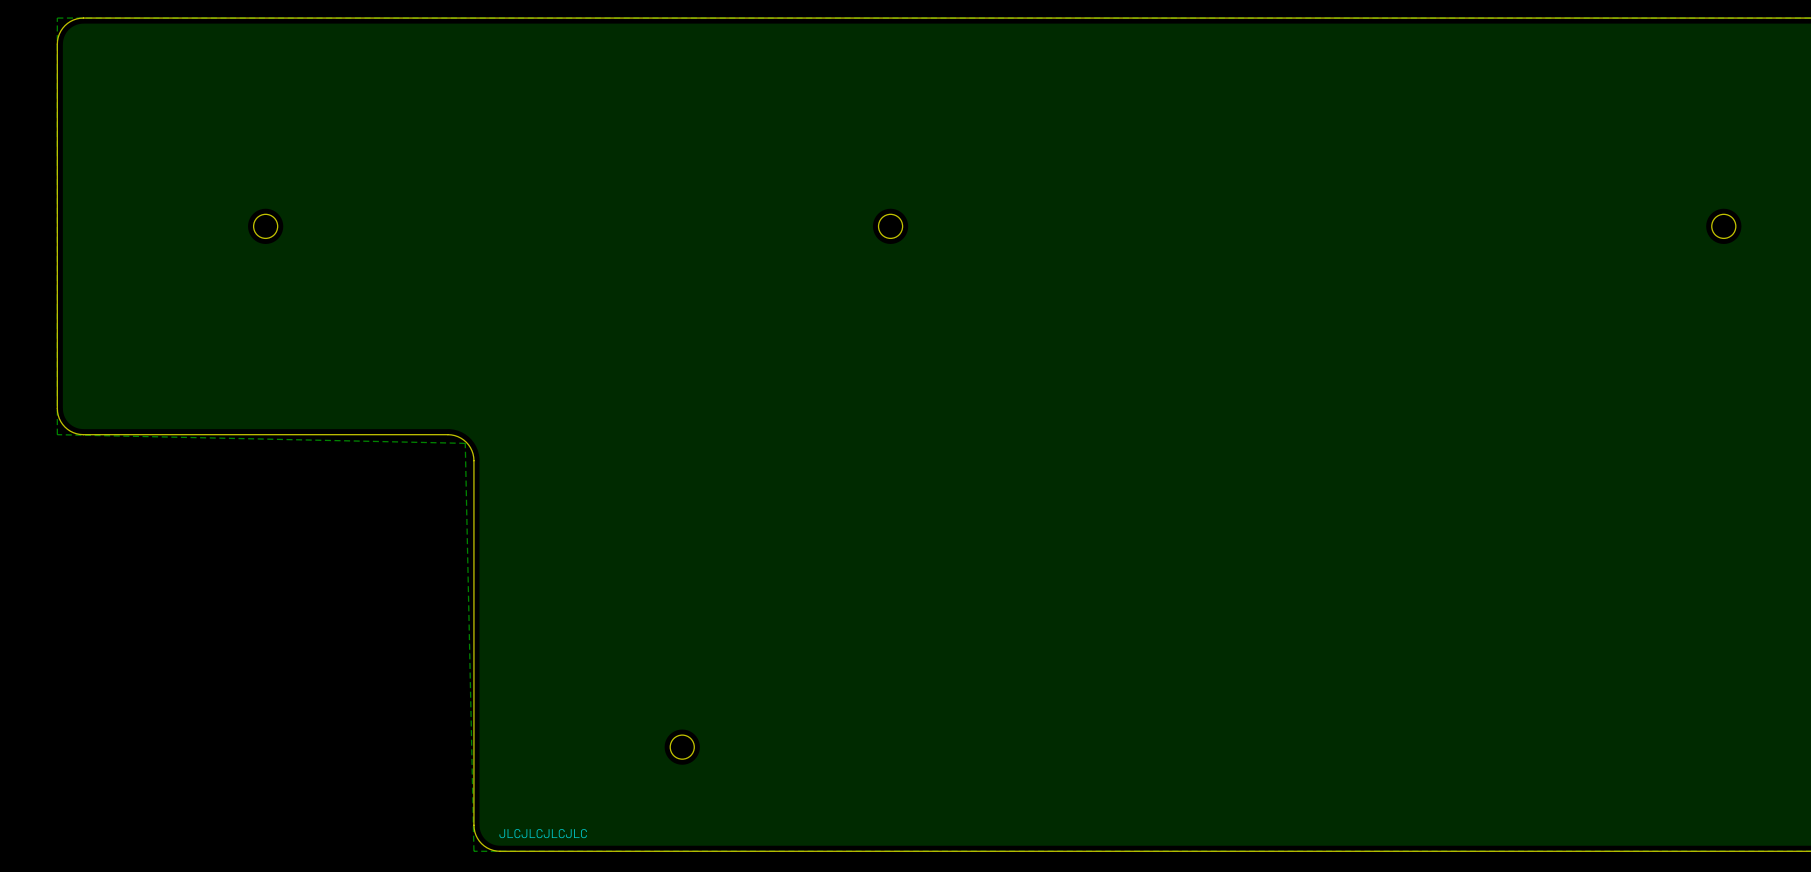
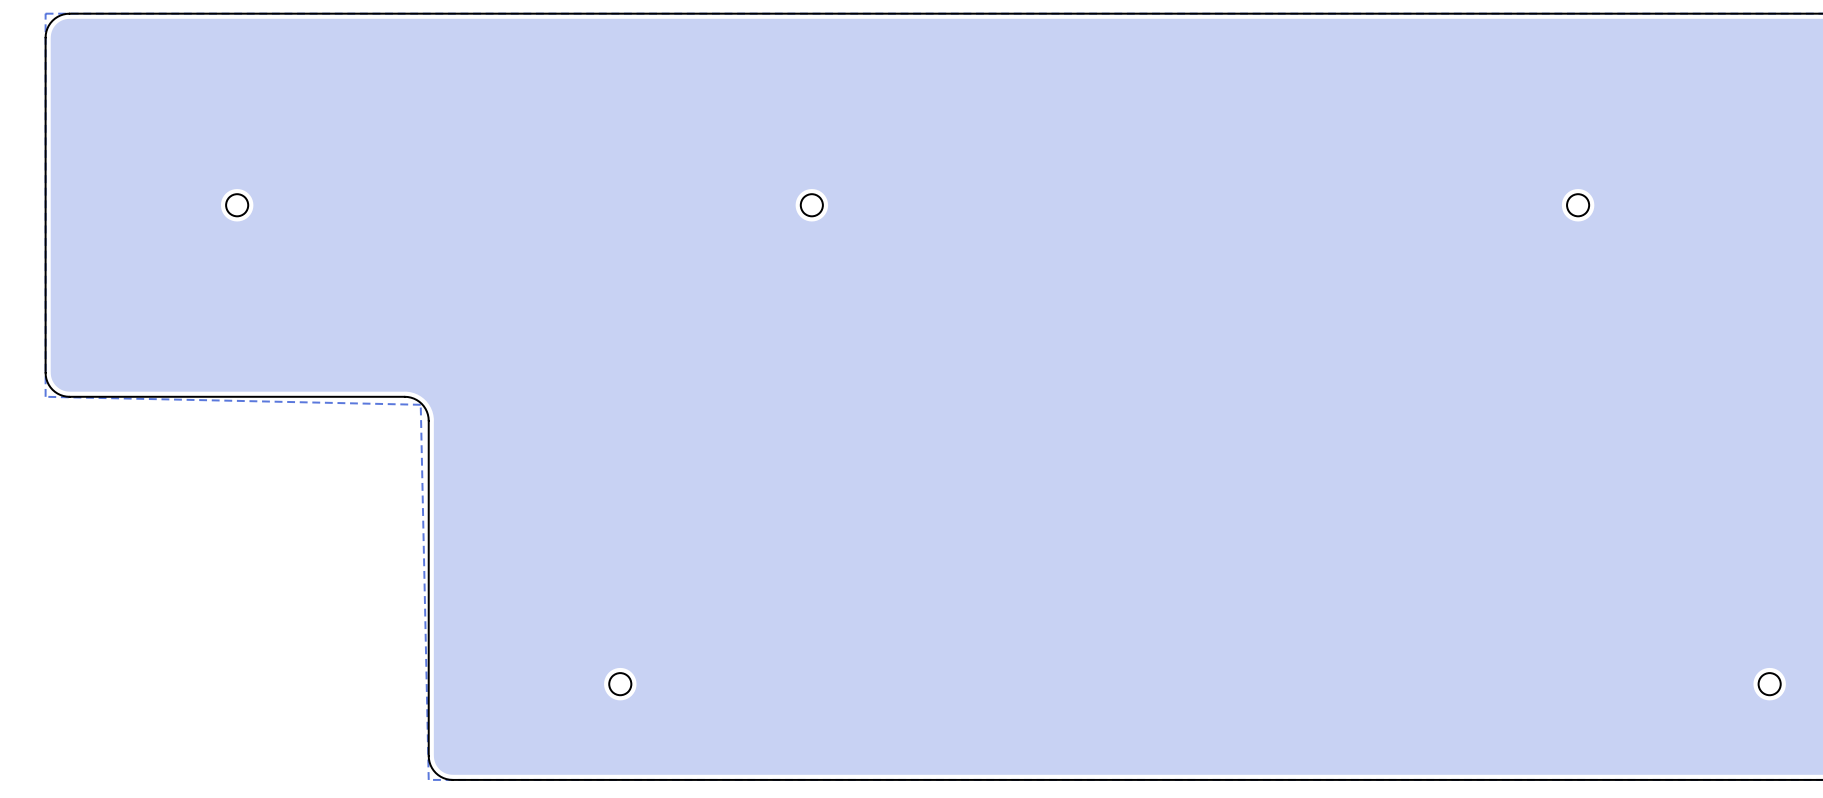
drawing: [499, 829, 587, 839] -> none

